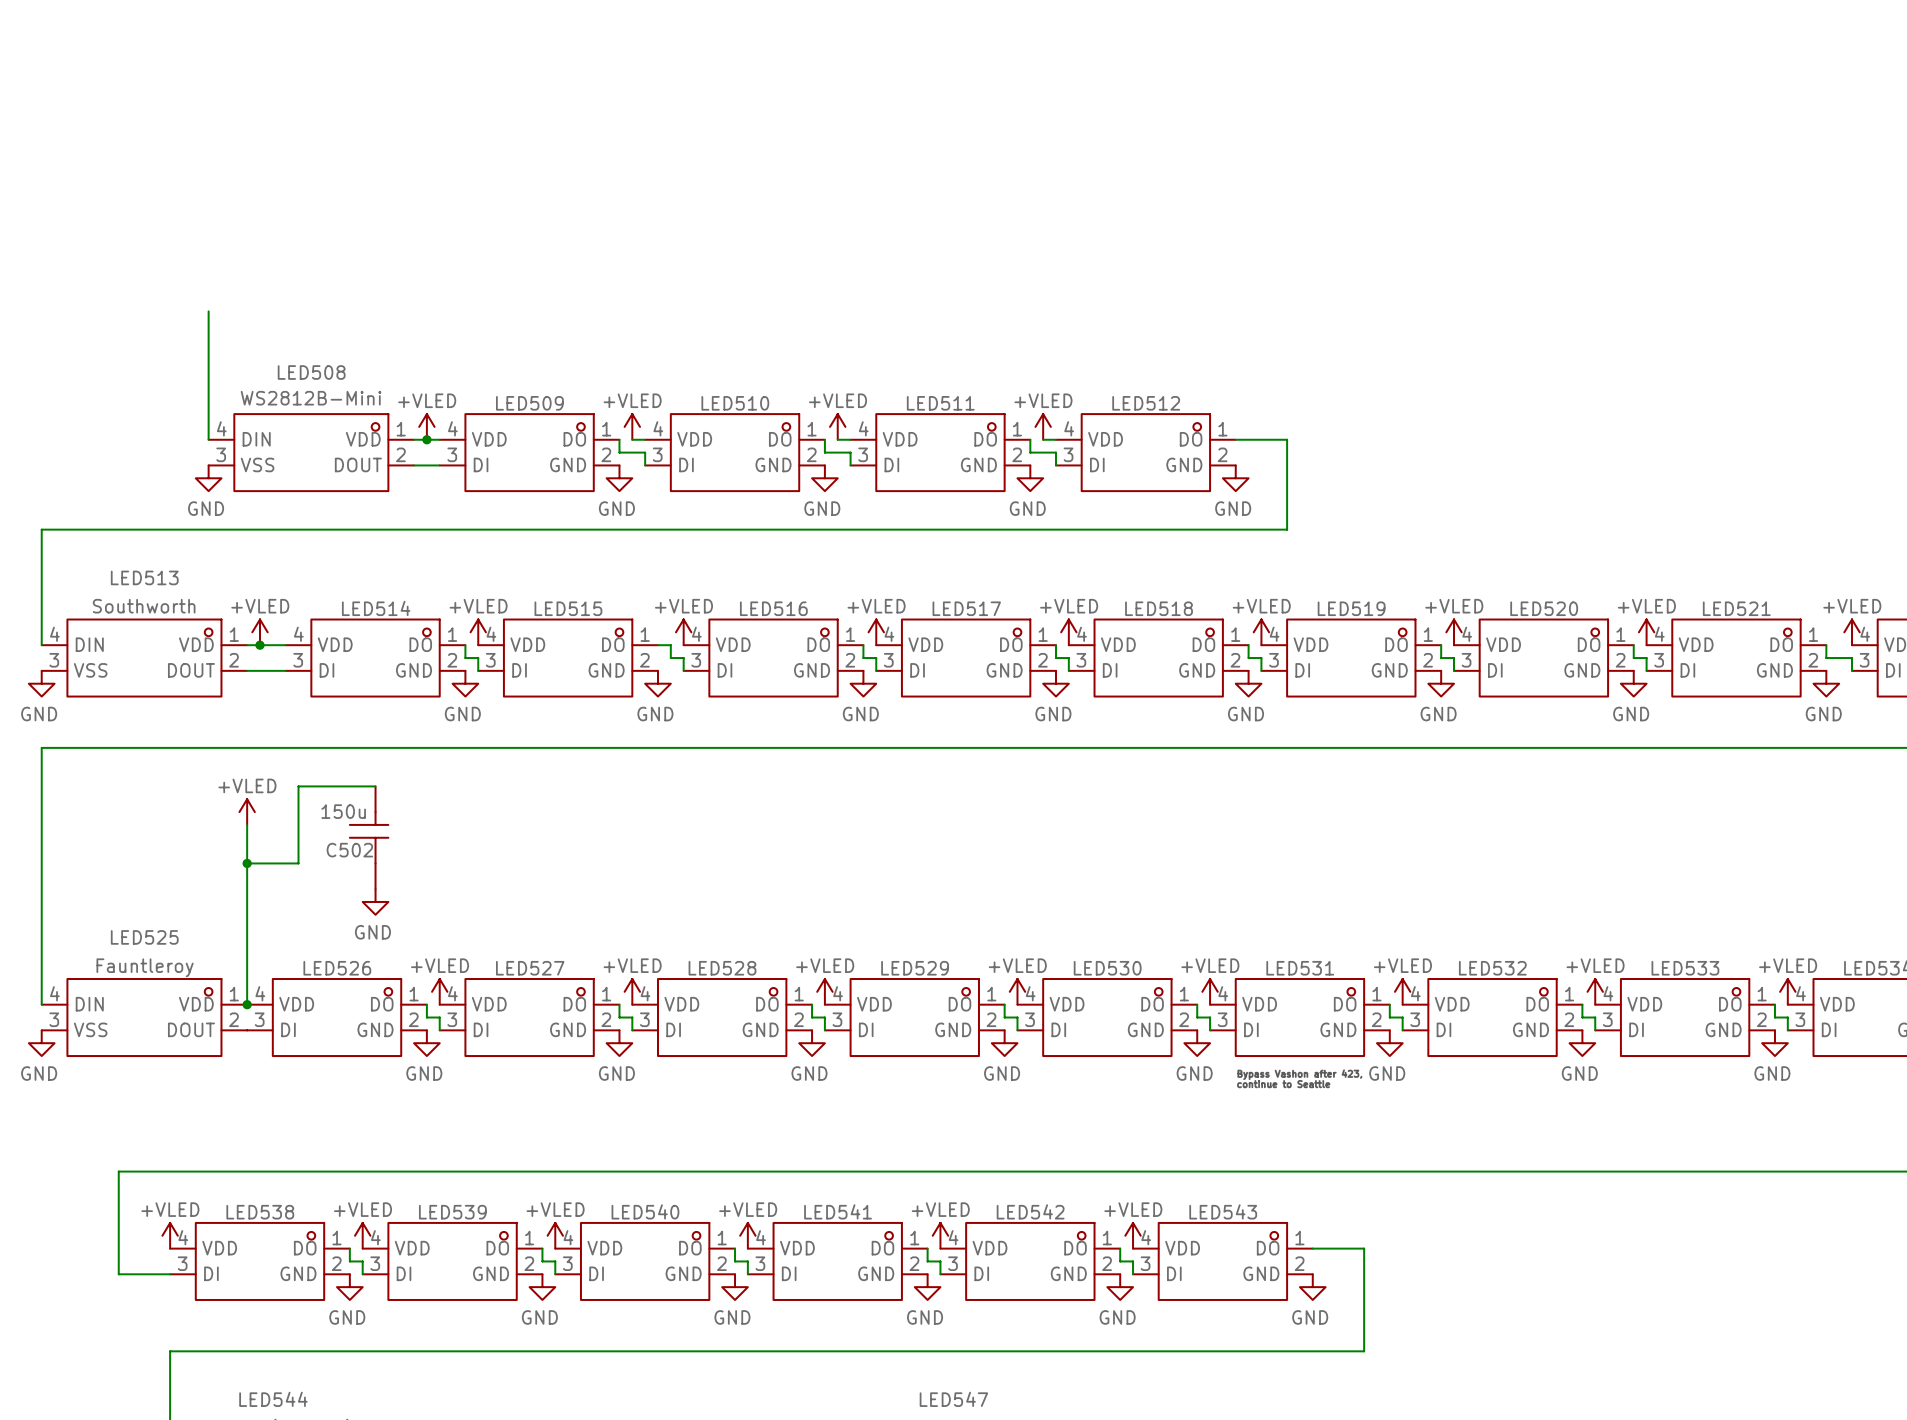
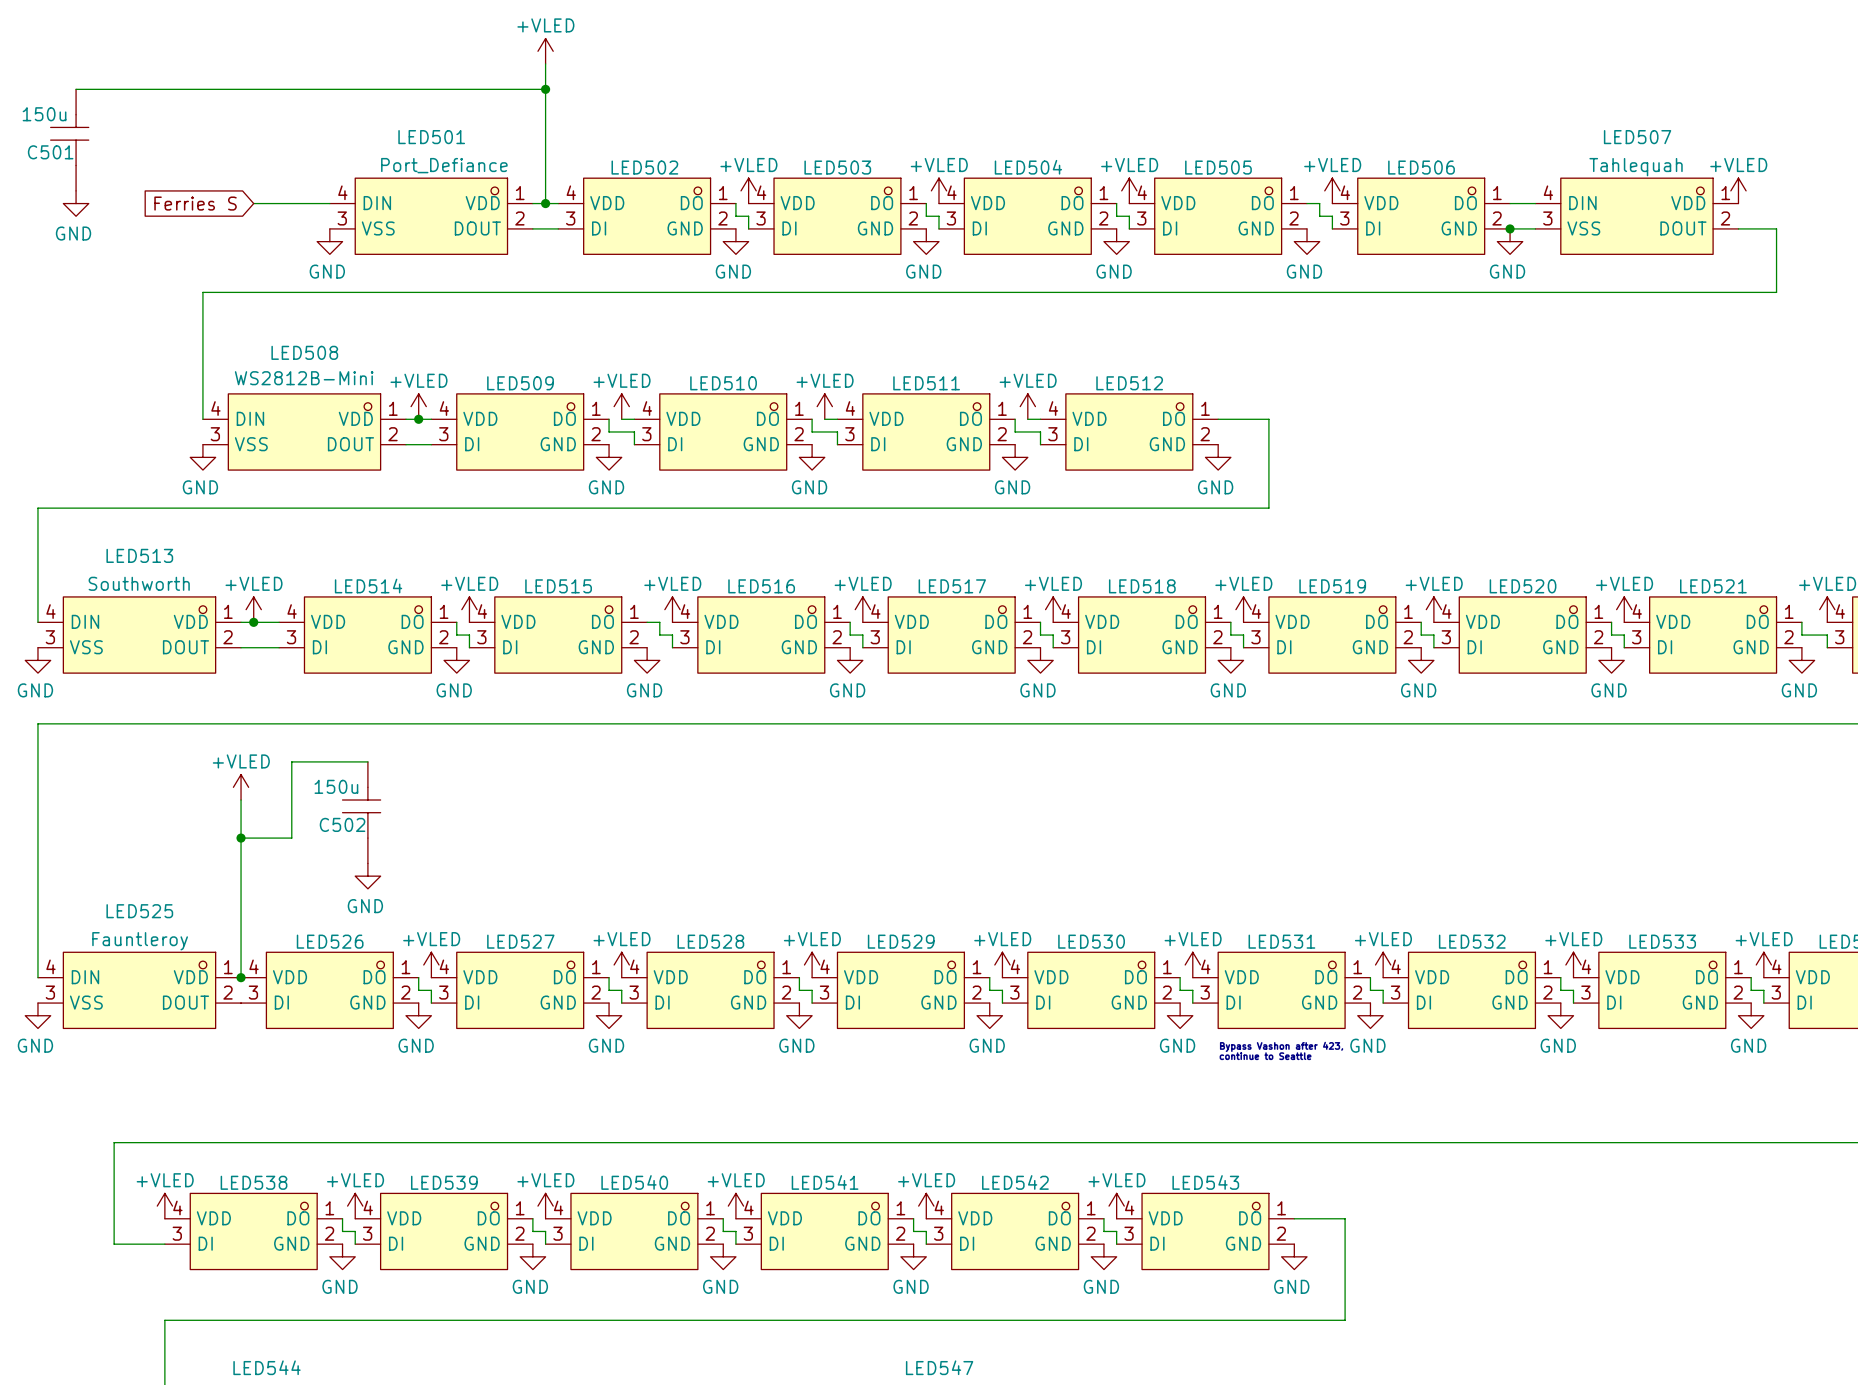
power symbol: none -> +VLED (545, 51)
wire: none -> (545, 63) (545, 203)
wire: none -> (76, 89) (545, 89)
junction: none -> (545, 89)
C501: none -> 150u (69, 140)
power symbol: none -> +VLED (748, 190)
power symbol: none -> +VLED (938, 190)
power symbol: none -> +VLED (1129, 190)
power symbol: none -> +VLED (1332, 190)
power symbol: none -> +VLED (1738, 190)
power symbol: none -> GND (76, 203)
global label: none -> Ferries S (195, 203)
wire: none -> (253, 203) (329, 203)
wire: none -> (532, 203) (558, 203)
junction: none -> (545, 203)
wire: none -> (735, 203) (735, 216) (748, 216) (748, 228)
wire: none -> (926, 203) (926, 216) (938, 216) (938, 228)
wire: none -> (1116, 203) (1116, 216) (1129, 216) (1129, 228)
wire: none -> (1307, 203) (1319, 203) (1319, 216) (1332, 216) (1332, 228)
wire: none -> (1510, 203) (1535, 203)
LED501: none -> (431, 216)
LED502: none -> (647, 216)
LED503: none -> (837, 216)
LED504: none -> (1027, 216)
LED505: none -> (1218, 216)
LED506: none -> (1421, 216)
LED507: none -> (1636, 216)
wire: none -> (532, 228) (558, 228)
wire: none -> (1510, 228) (1535, 228)
junction: none -> (1510, 228)
wire: none -> (1738, 228) (1776, 228) (1776, 292) (202, 292)
power symbol: none -> GND (329, 241)
power symbol: none -> GND (735, 241)
power symbol: none -> GND (926, 241)
power symbol: none -> GND (1116, 241)
power symbol: none -> GND (1307, 241)
power symbol: none -> GND (1510, 241)

